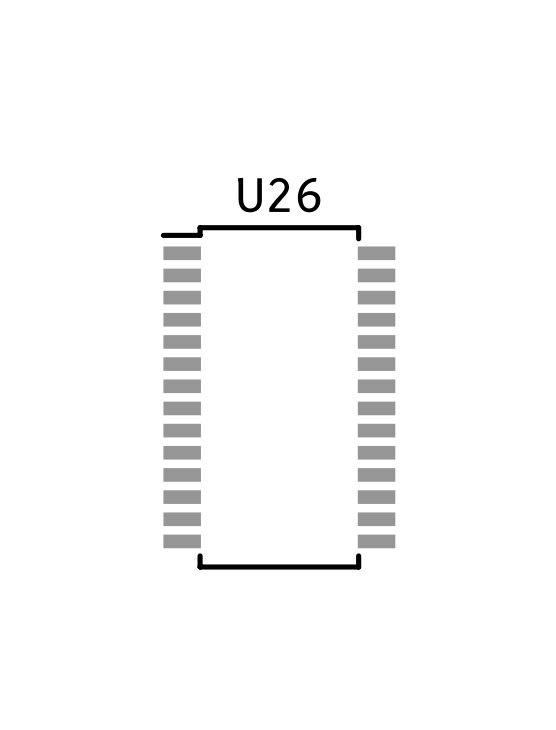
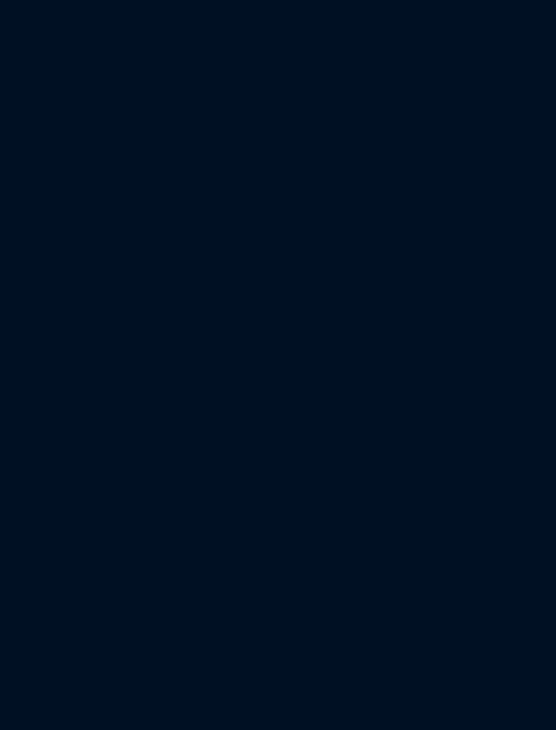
U26: (278, 397) -> none

